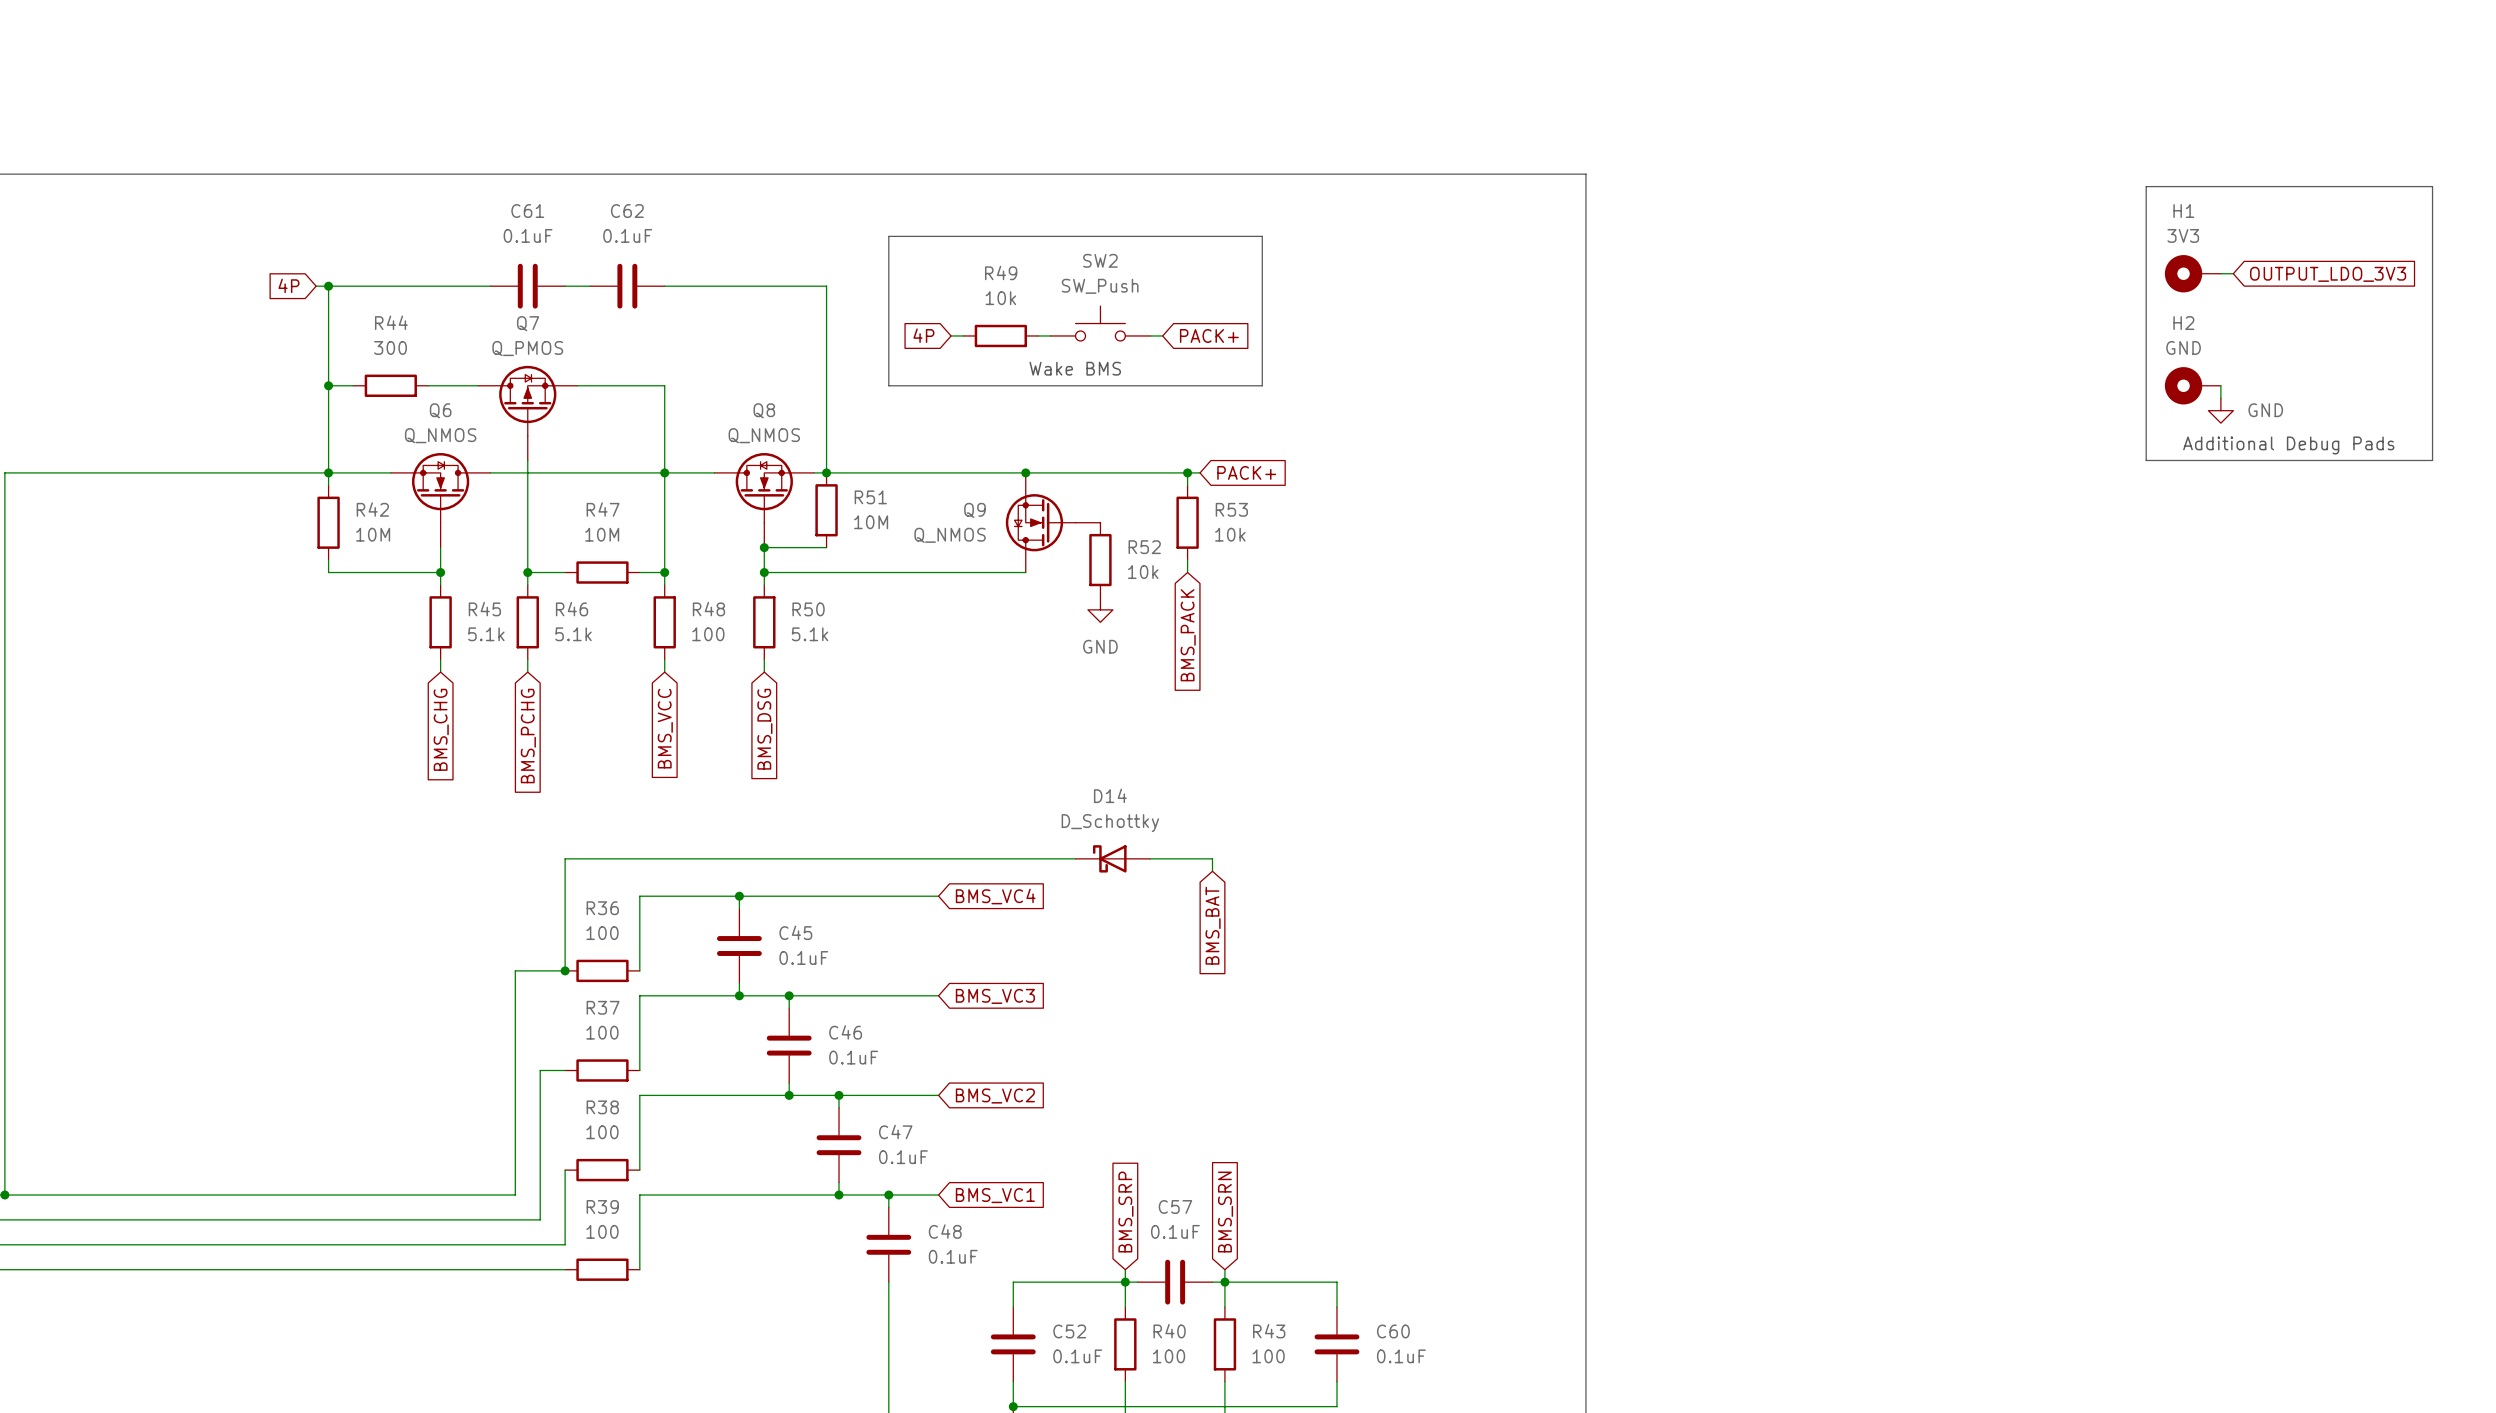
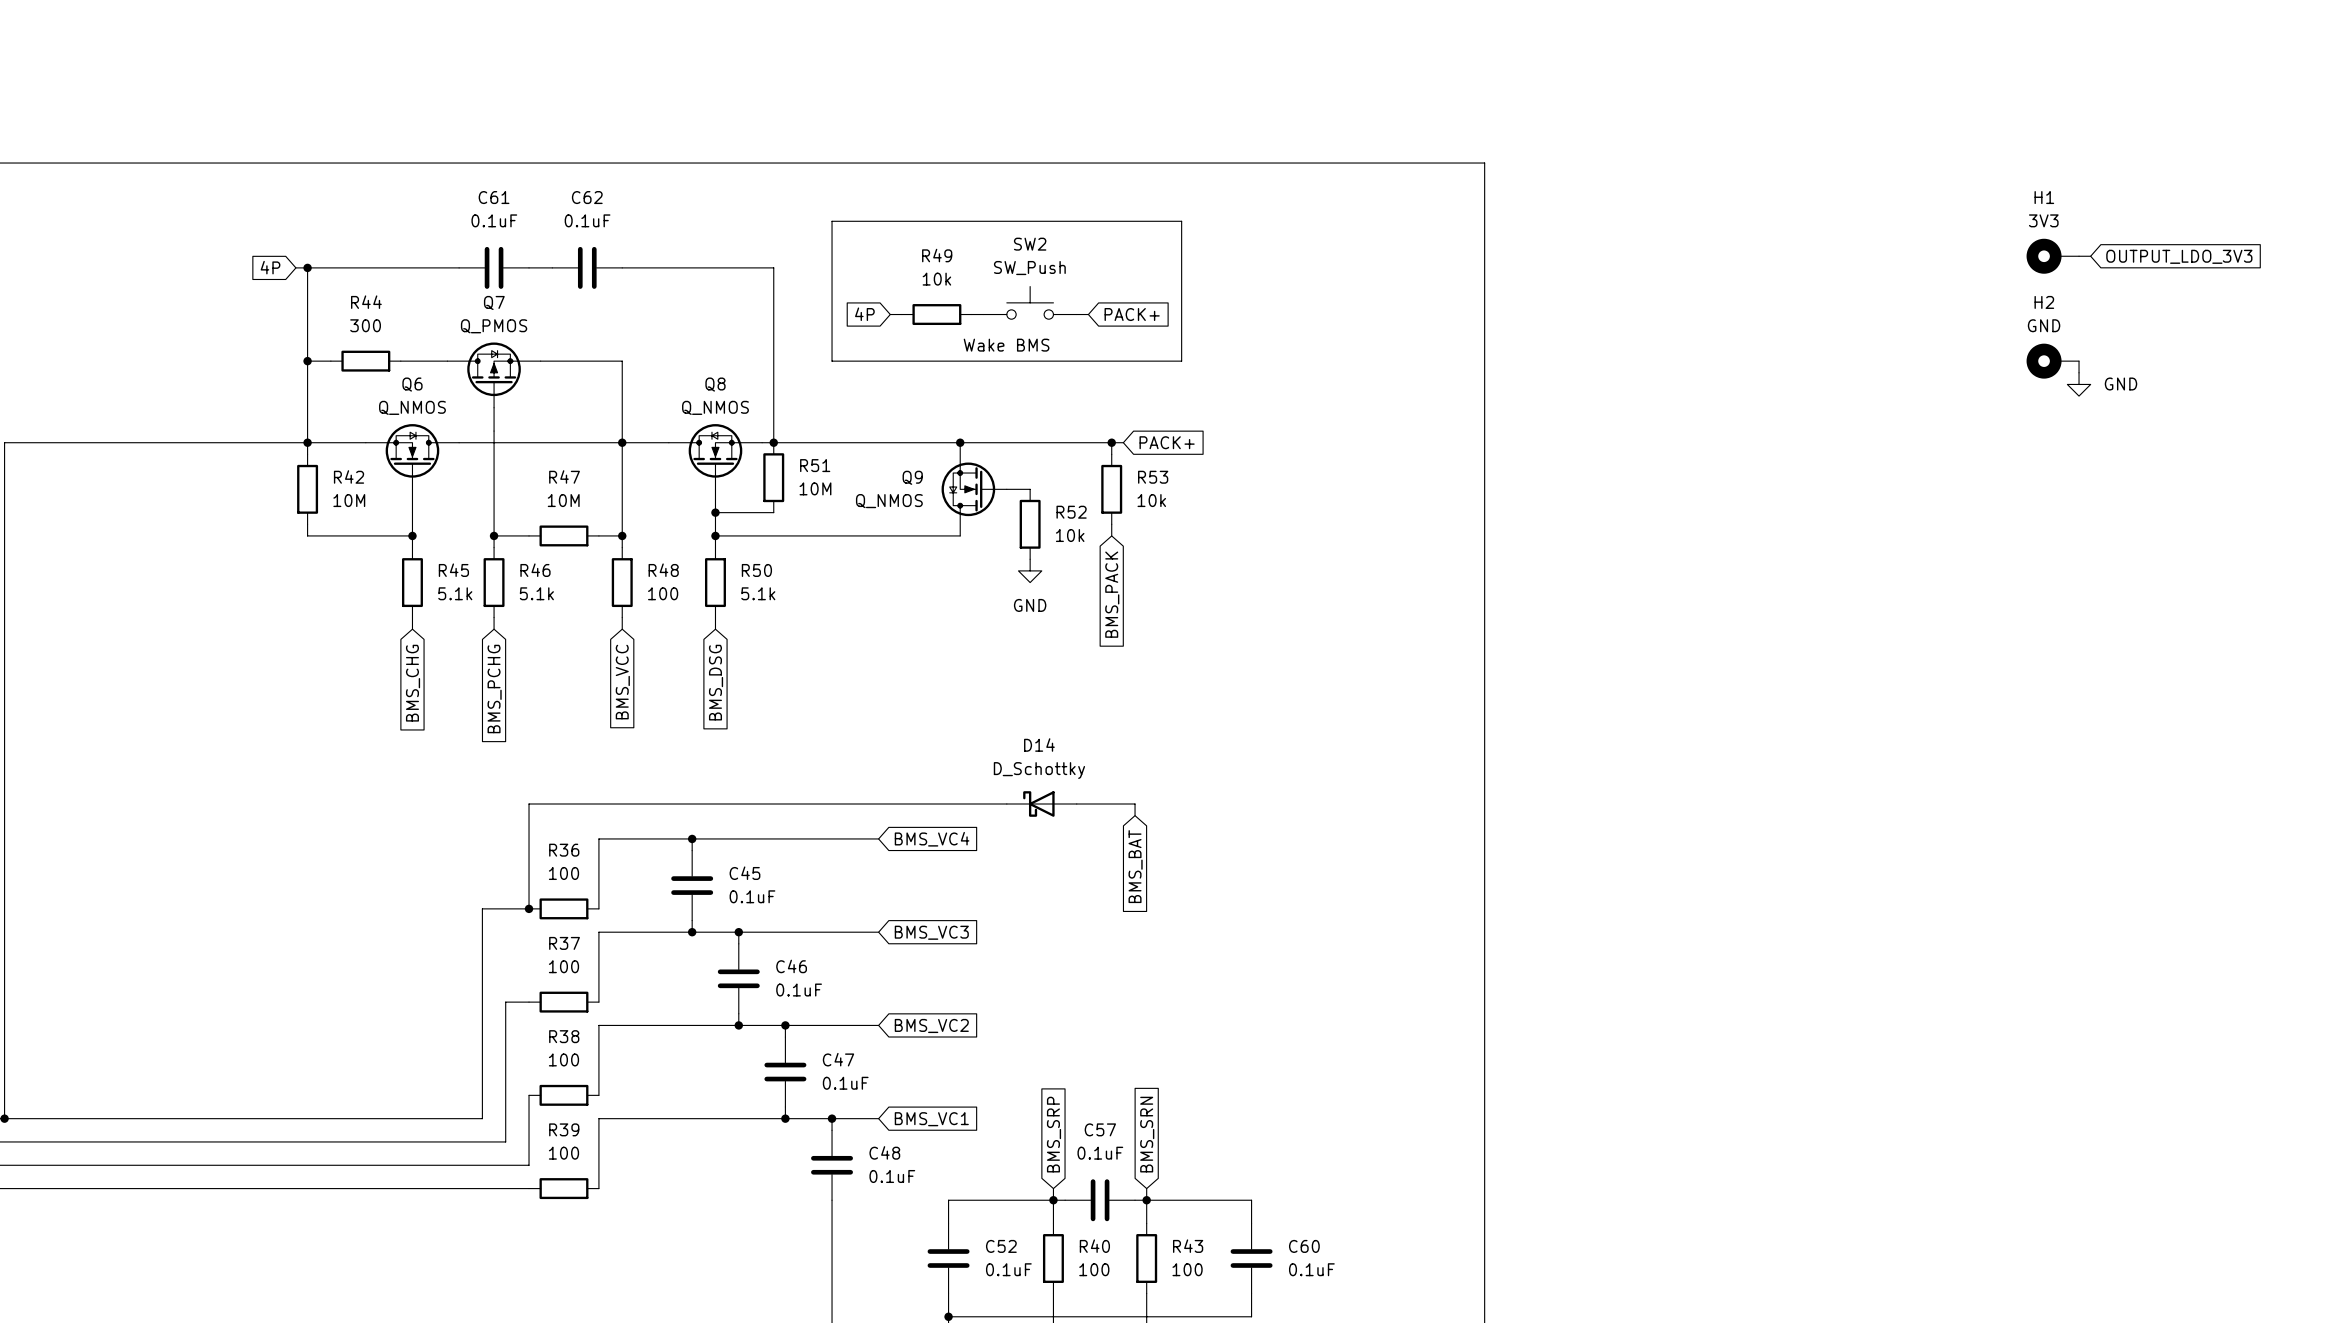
line: (2146, 186) (2432, 186) (2432, 460) (2146, 460) (2146, 186) -> none
text: Additional Debug Pads (2288, 445) -> none

